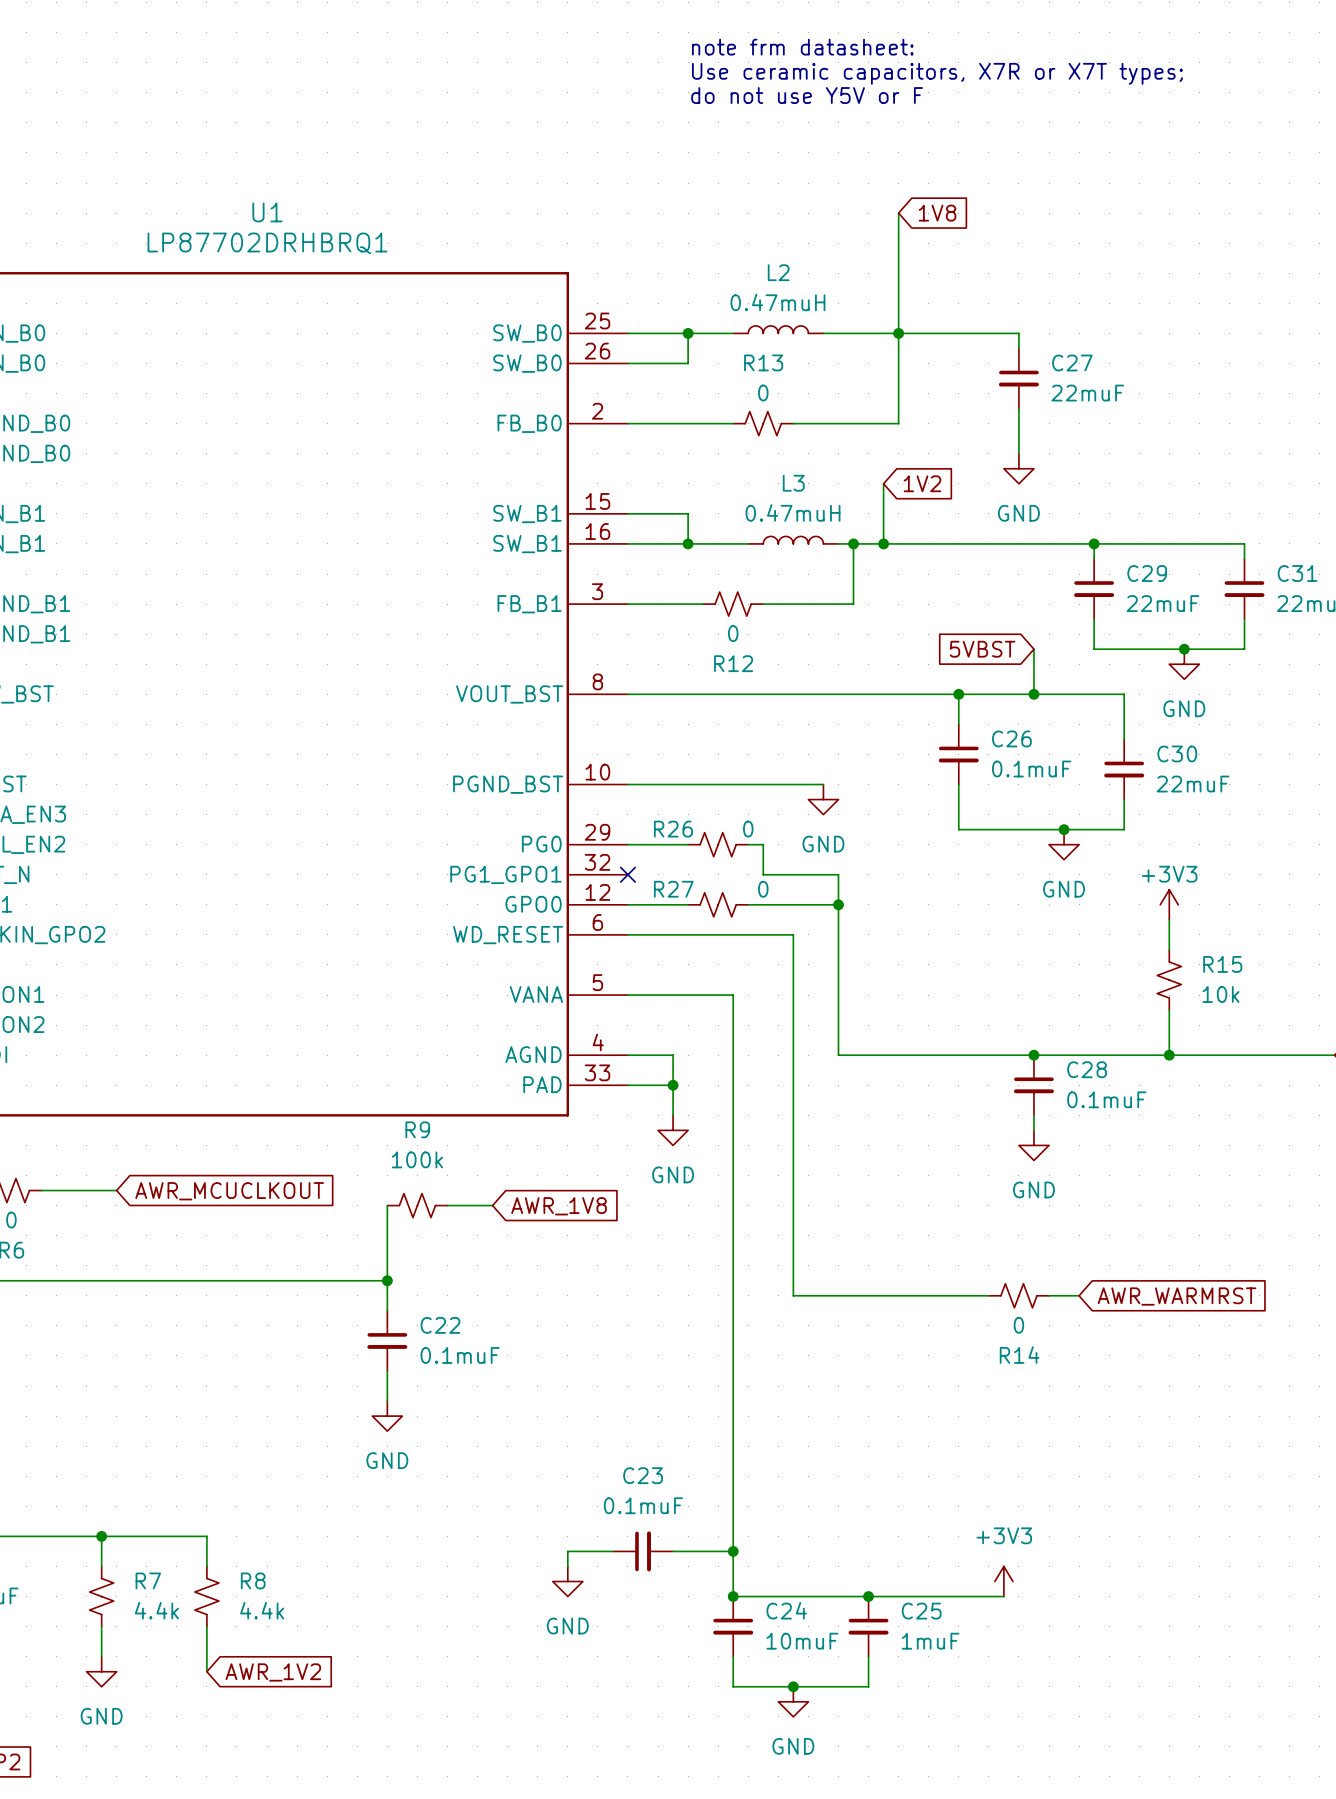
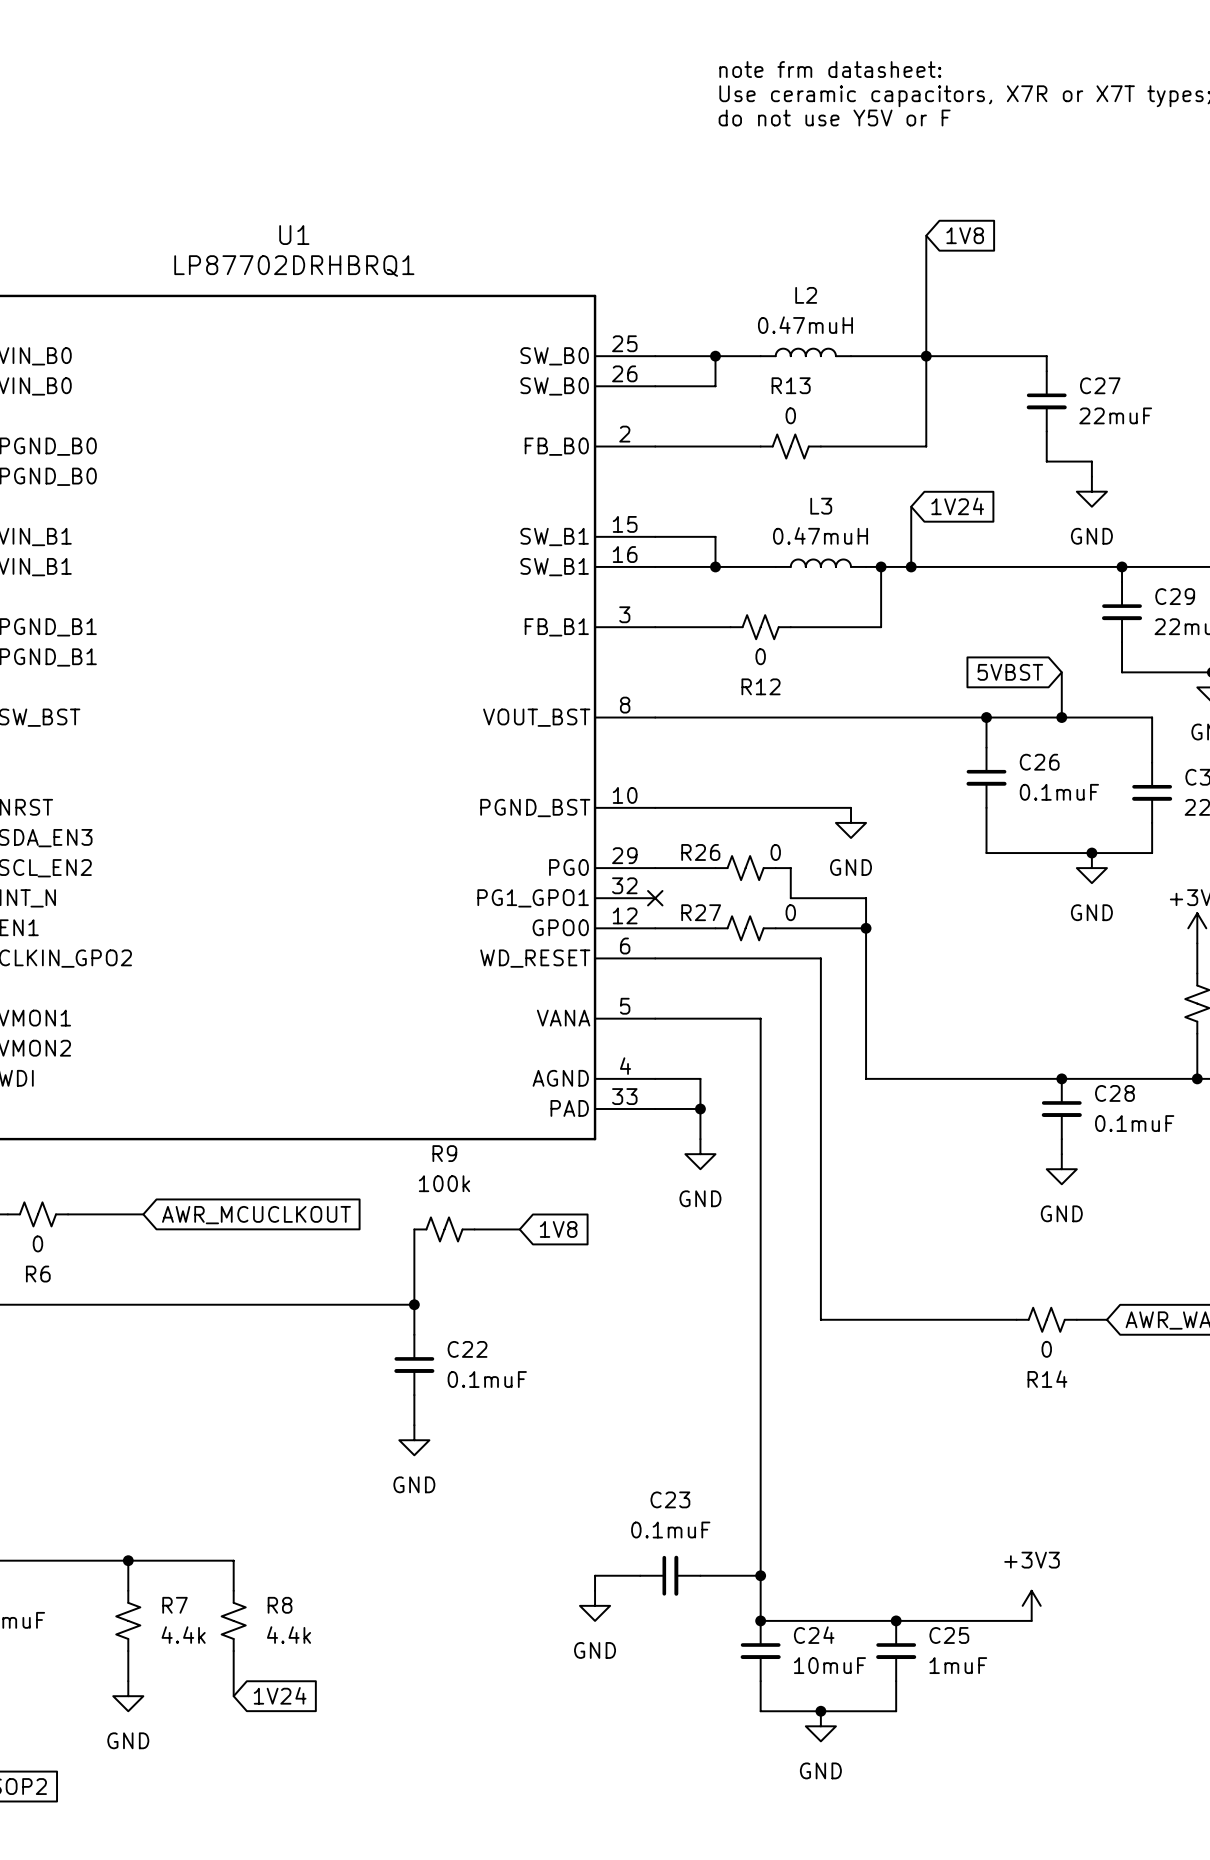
wire: (1018, 438) (1018, 453) -> (1046, 461) (1091, 461) (1091, 476)
power symbol position: GND (1018, 468) -> GND (1091, 491)
global label: 1V2 (922, 483) -> 1V24 (957, 506)
global label: AWR_1V8 (559, 1206) -> 1V8 (558, 1229)
global label: AWR_1V2 (273, 1672) -> 1V24 (280, 1695)

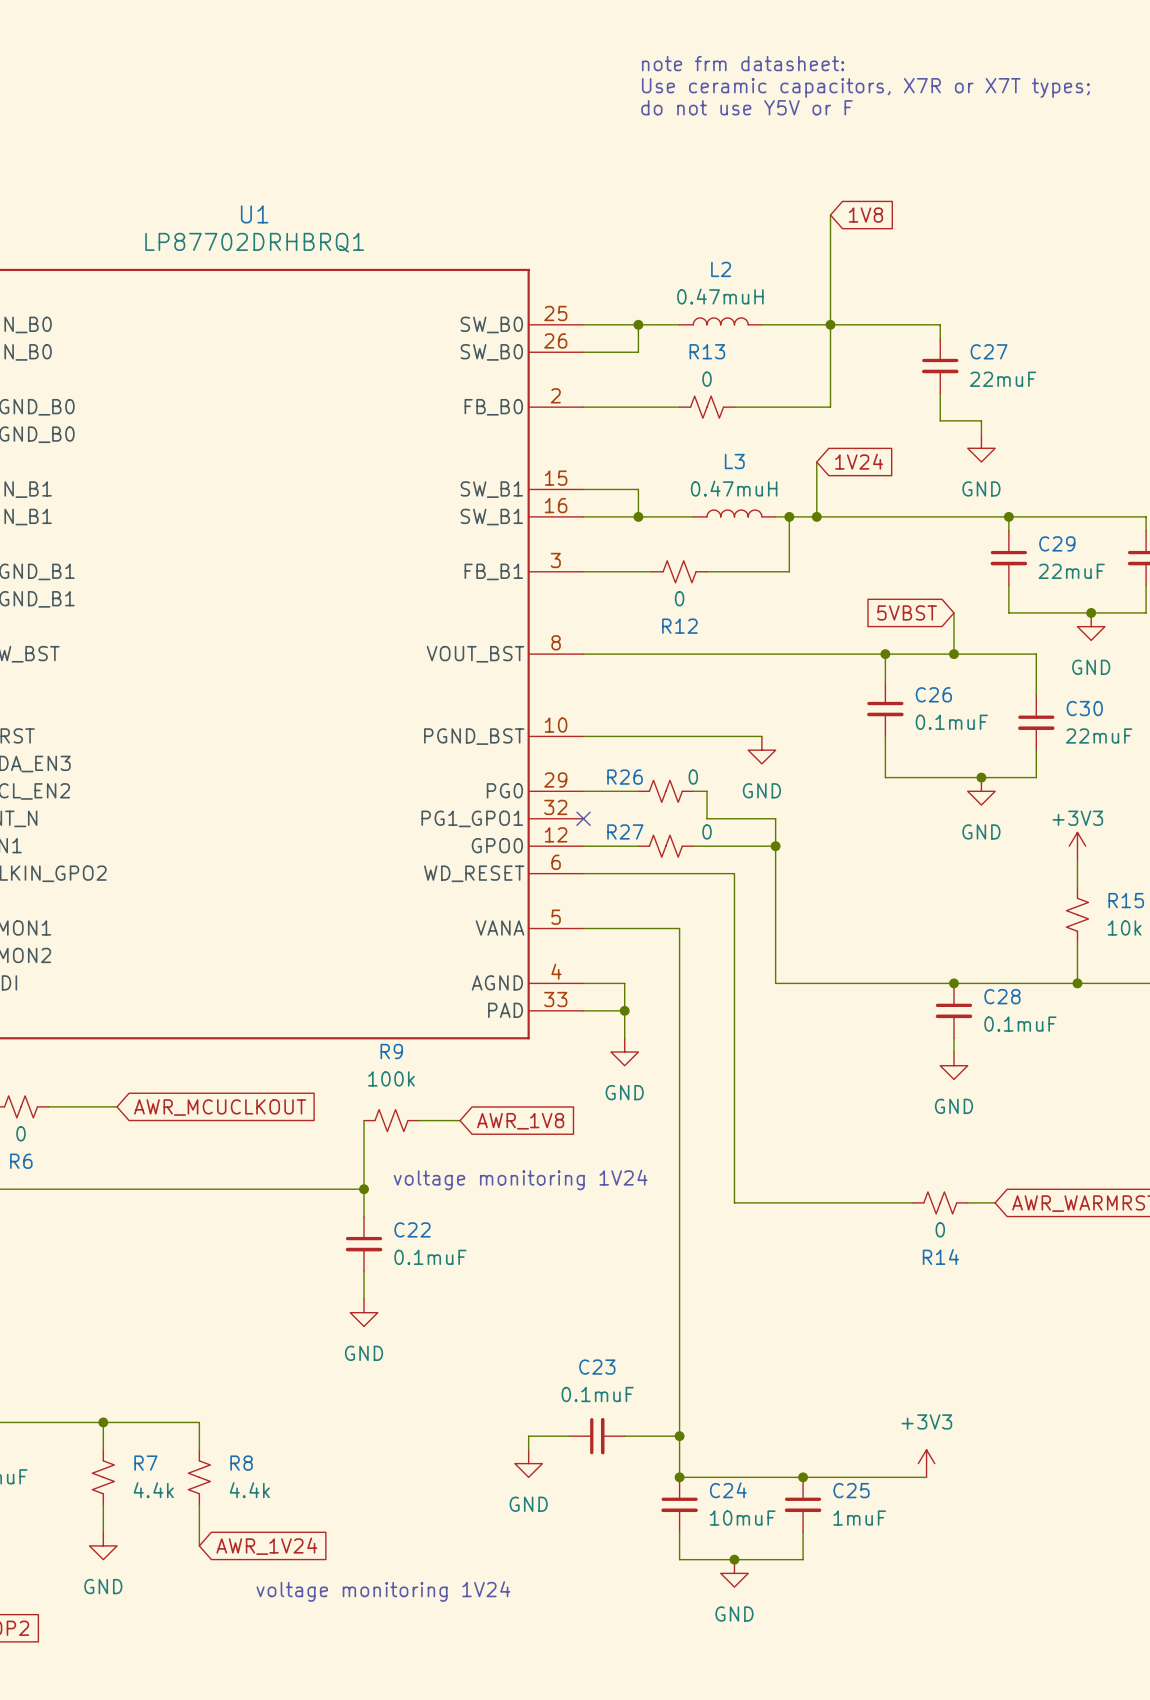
global label: 1V8 (558, 1229) -> AWR_1V8 (520, 1121)
text: none -> voltage monitoring 1V24 (520, 1179)
global label: 1V24 (280, 1695) -> AWR_1V24 (266, 1546)
text: none -> voltage monitoring 1V24 (383, 1591)

